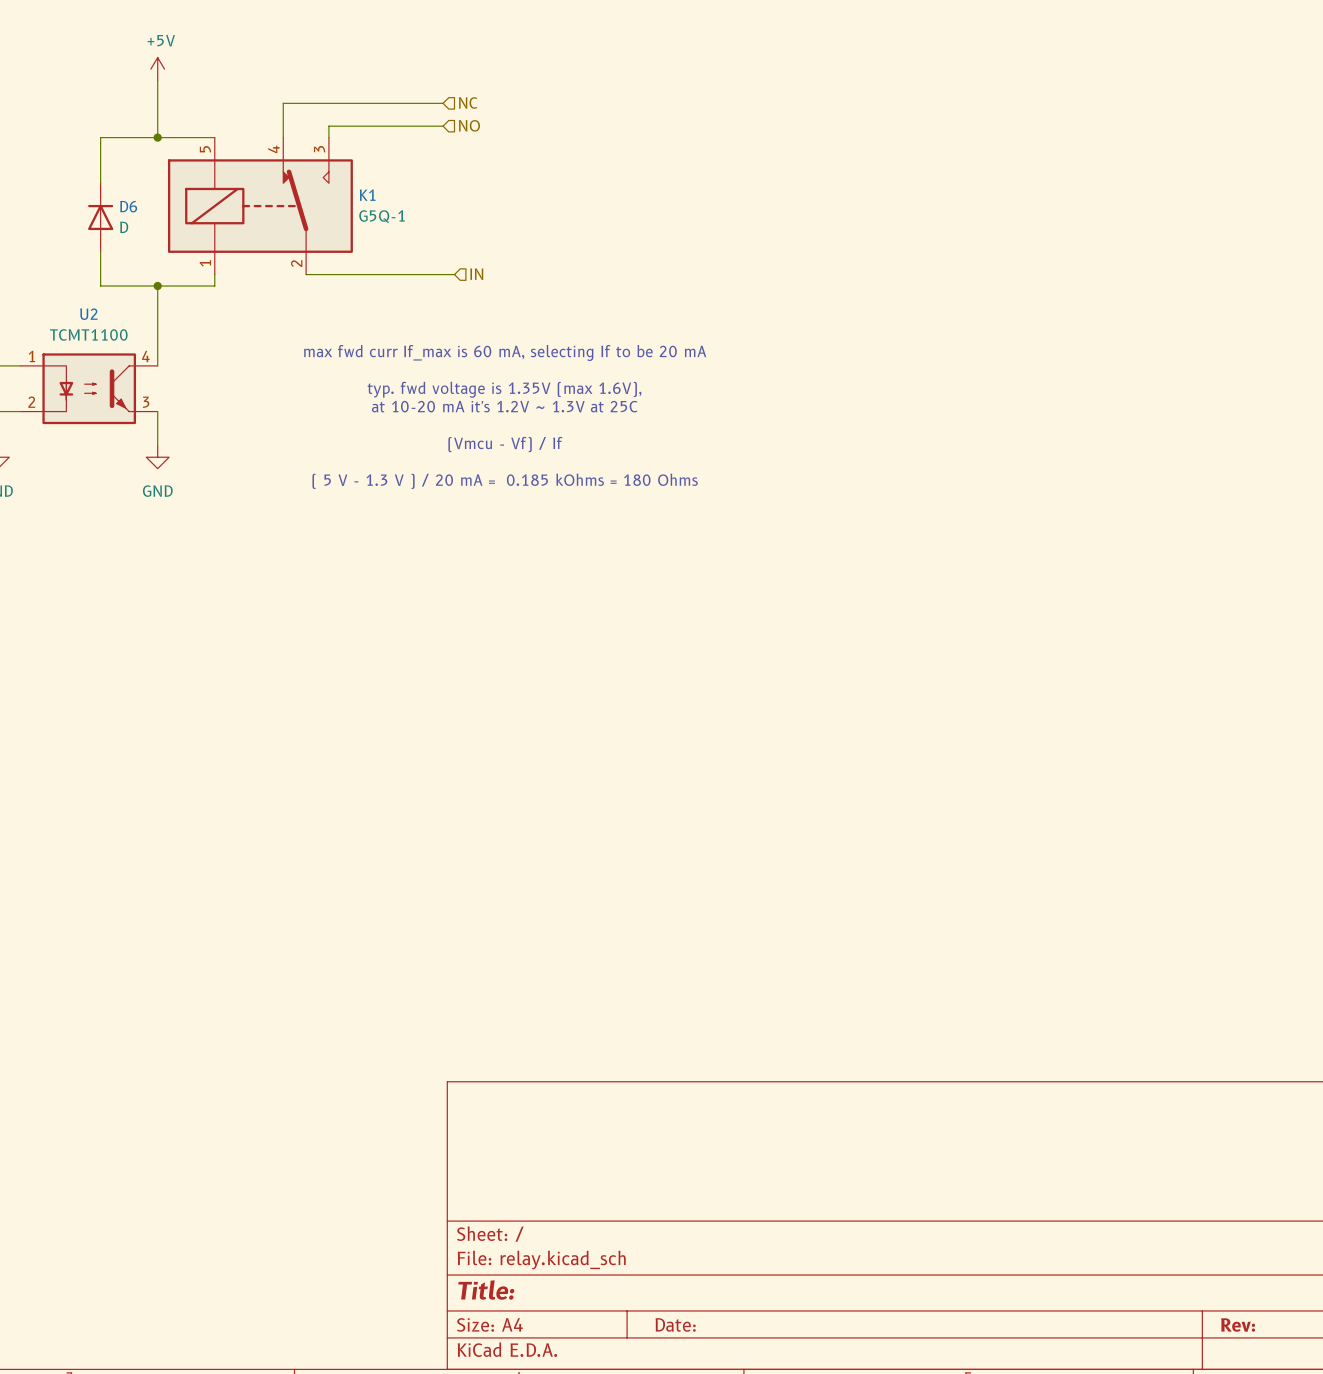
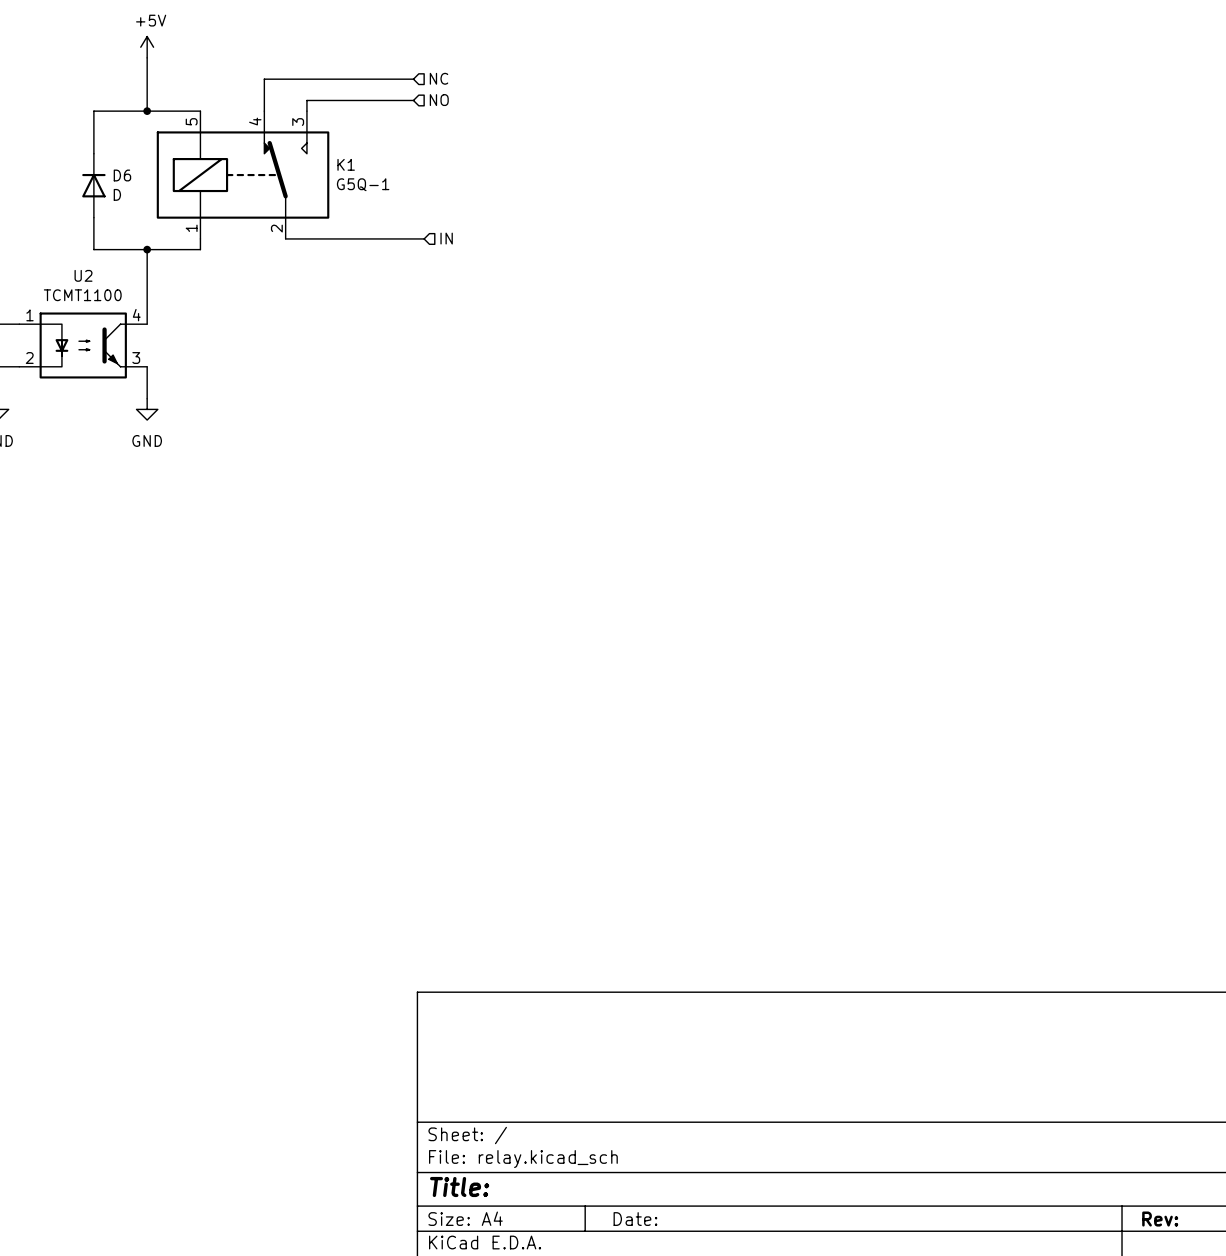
text: max fwd curr If_max is 60 mA, selecting If to be 20 mA (505, 352) -> none
text: typ. fwd voltage is 1.35V (max 1.6V), (504, 389) -> none
text: at 10-20 mA it's 1.2V ~ 1.3V at 25C (504, 406) -> none
text: (Vmcu - Vf) / If (505, 444) -> none
text: ( 5 V - 1.3 V ) / 20 mA = 0.185 kOhms = 180 Ohms (505, 481) -> none

